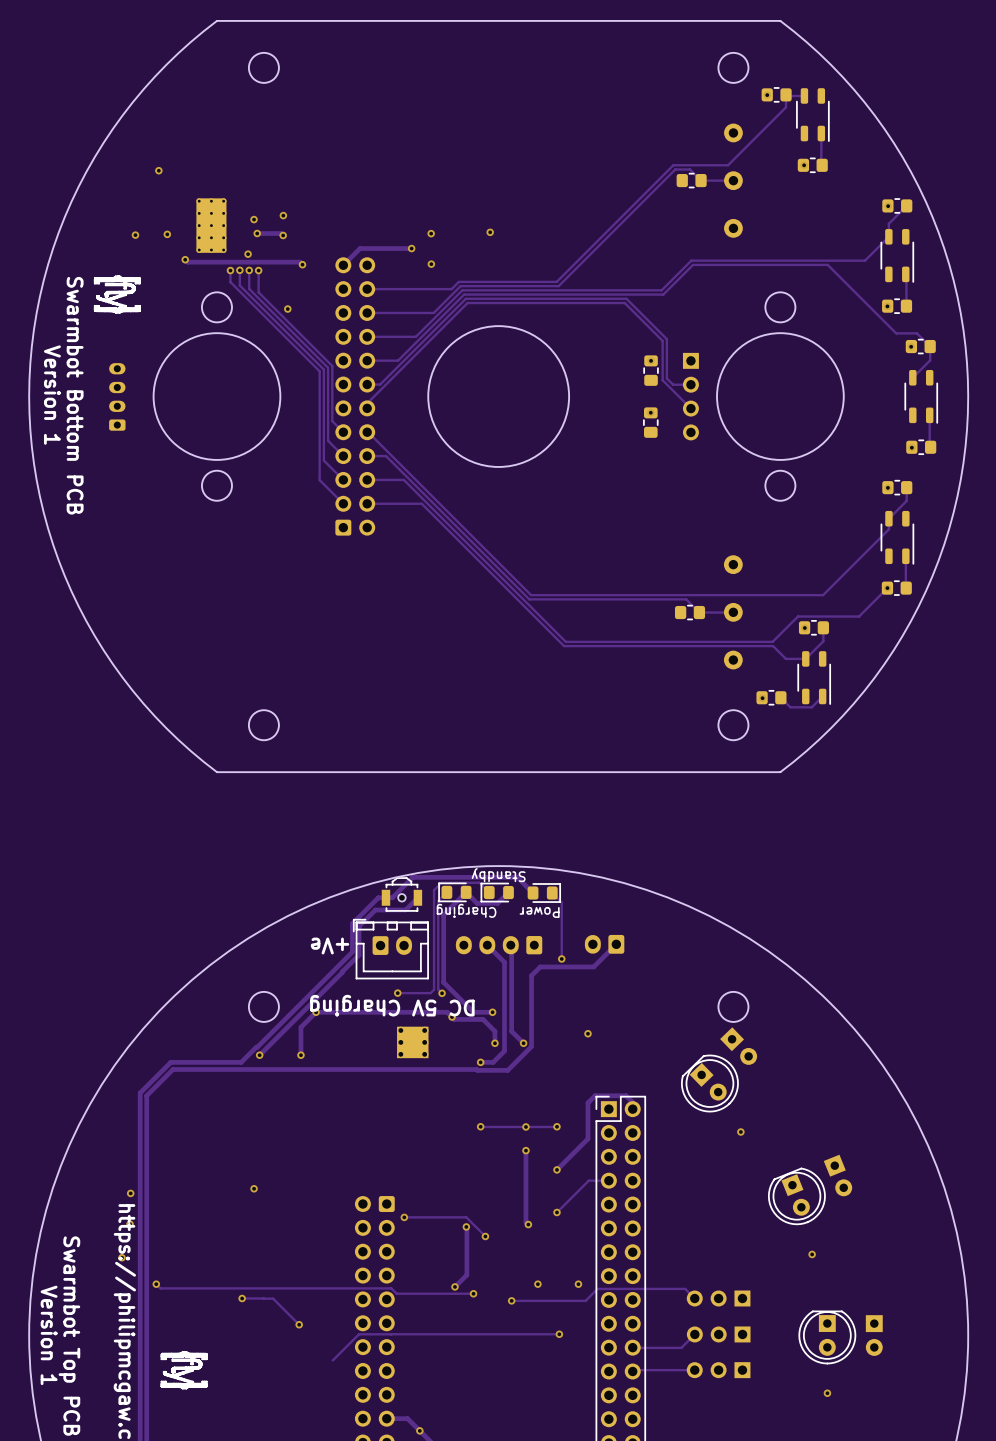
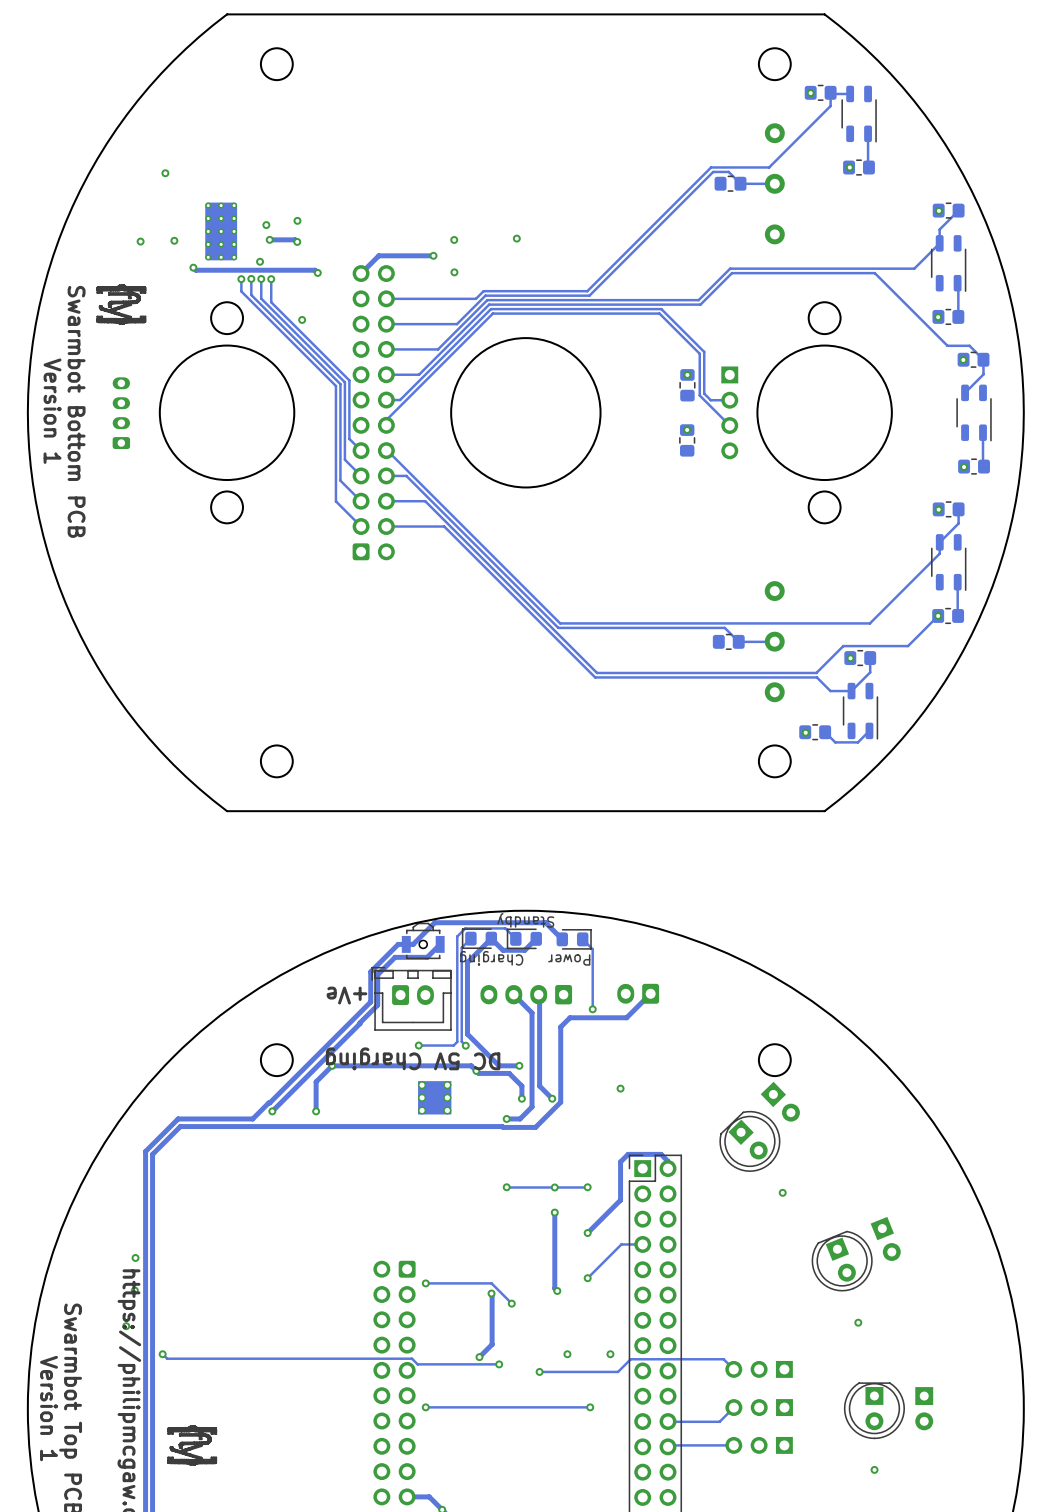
via: (254, 1188) -> none
track: (242, 1298) (273, 1298) (299, 1324) -> none
via: (242, 1298) -> none
via: (299, 1324) -> none
track: (404, 1334) (358, 1334) (332, 1360) -> none
via: none -> (425, 1407)

